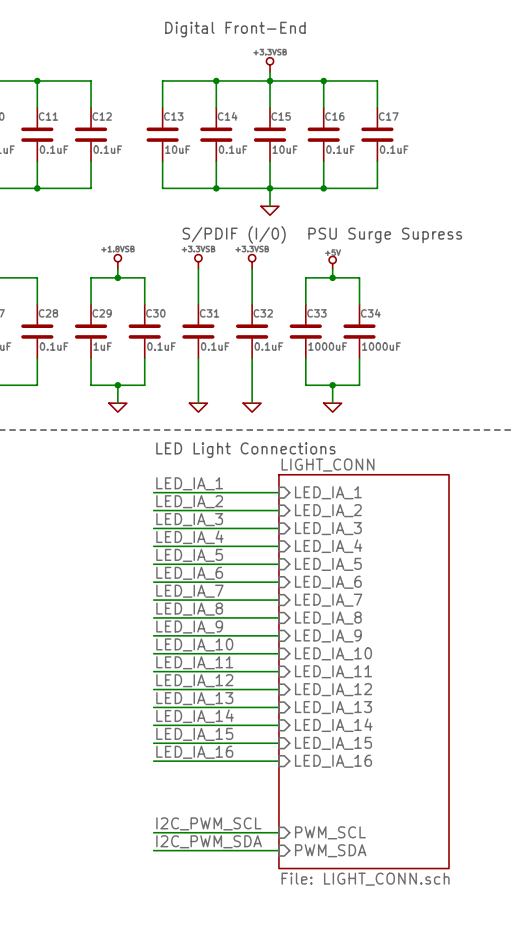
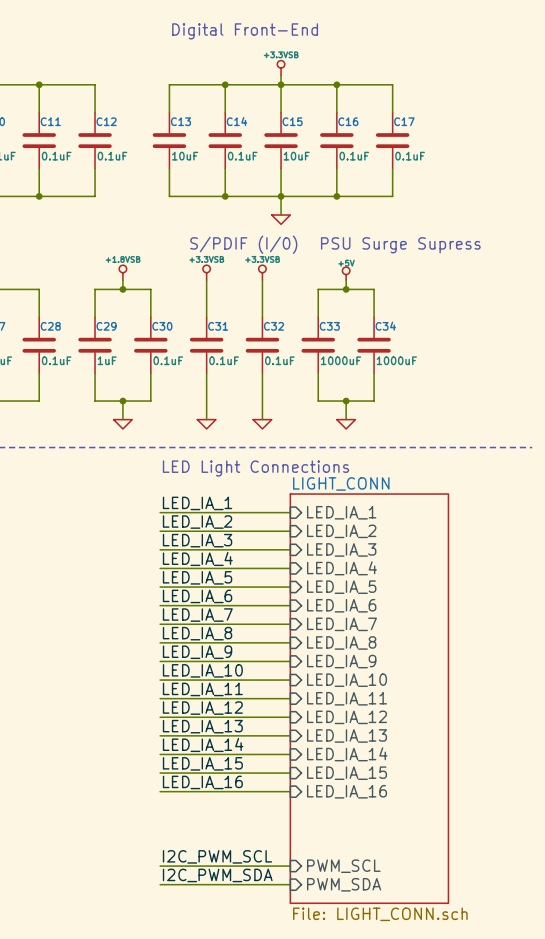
sheet LIGHT_CONN: none -> File: LIGHT_CONN.sch (369, 698)
sheet LIGHT_CONN: File: LIGHT_CONN.sch (363, 671) -> none

